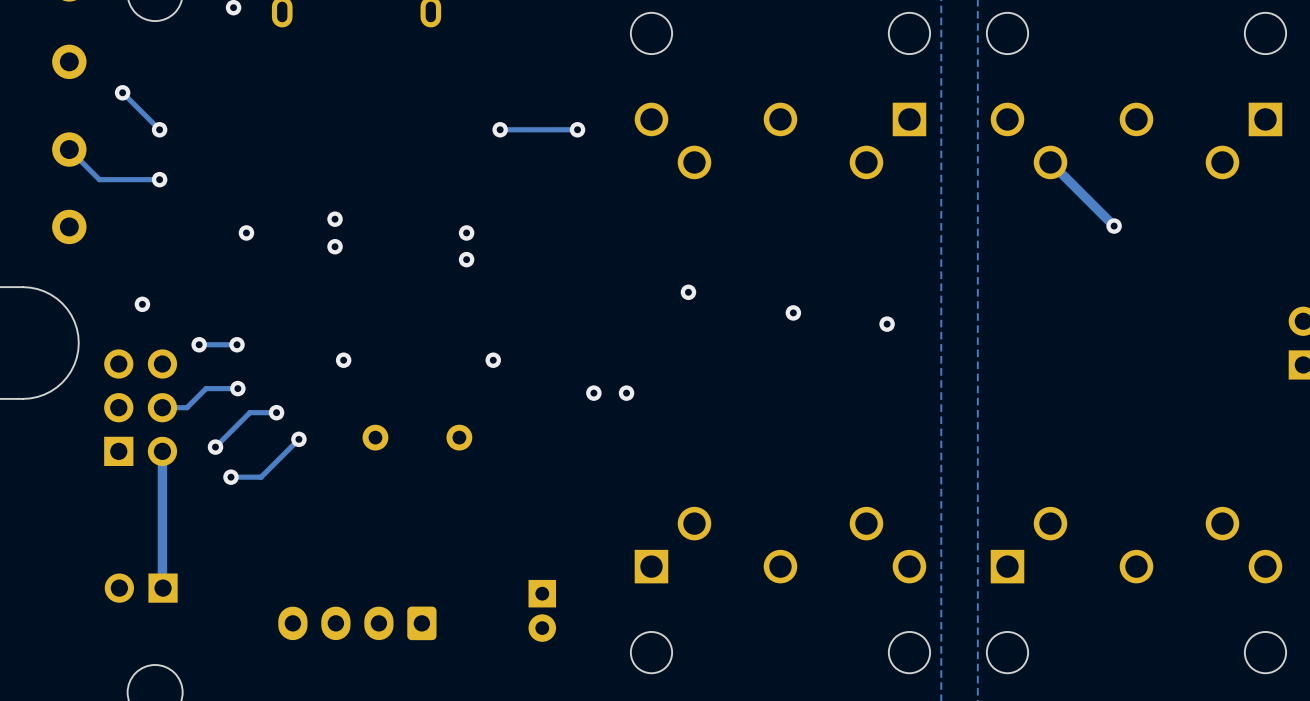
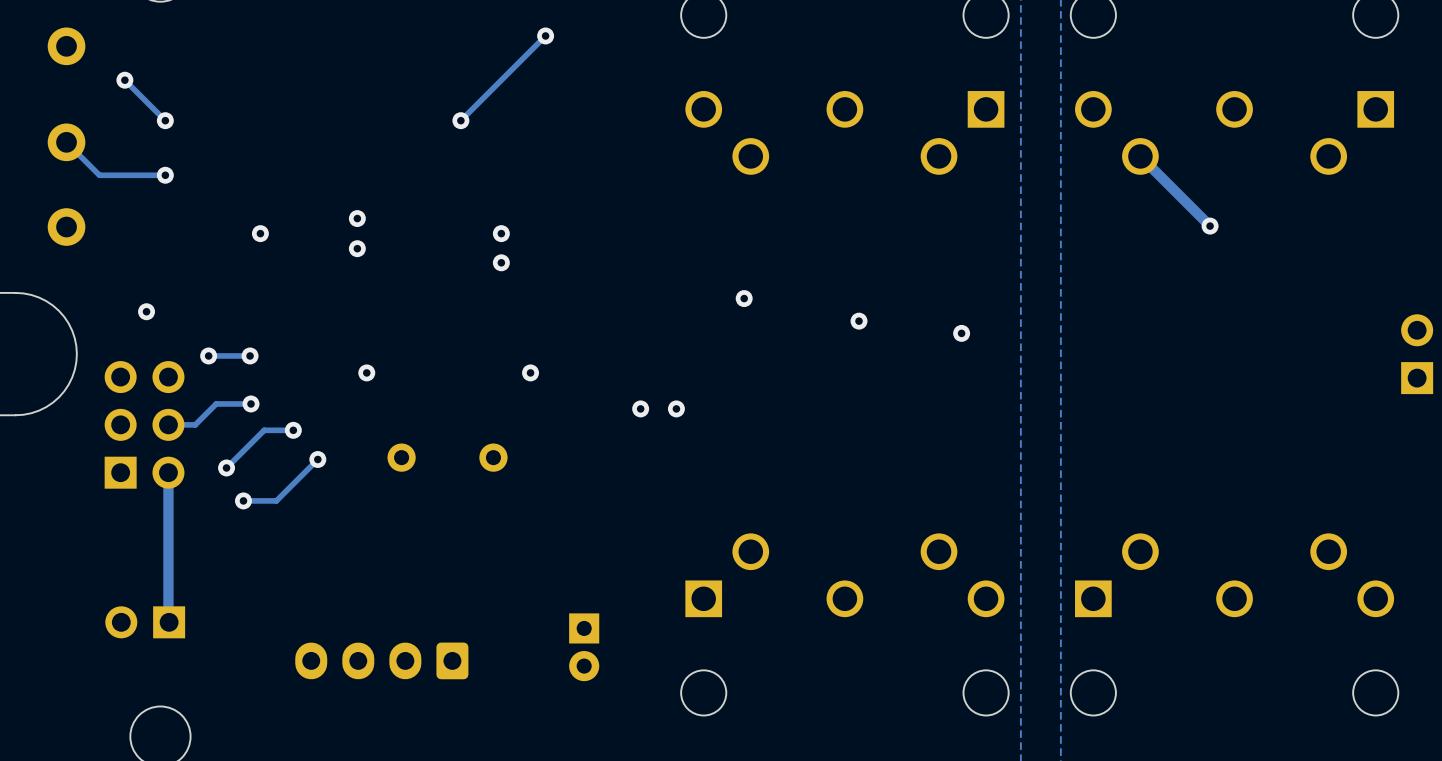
track: none -> (545, 35) (460, 120)
via: none -> (545, 35)
via: none -> (460, 120)
via: (500, 129) -> none
track: (577, 129) (500, 129) -> none
via: (577, 129) -> none

